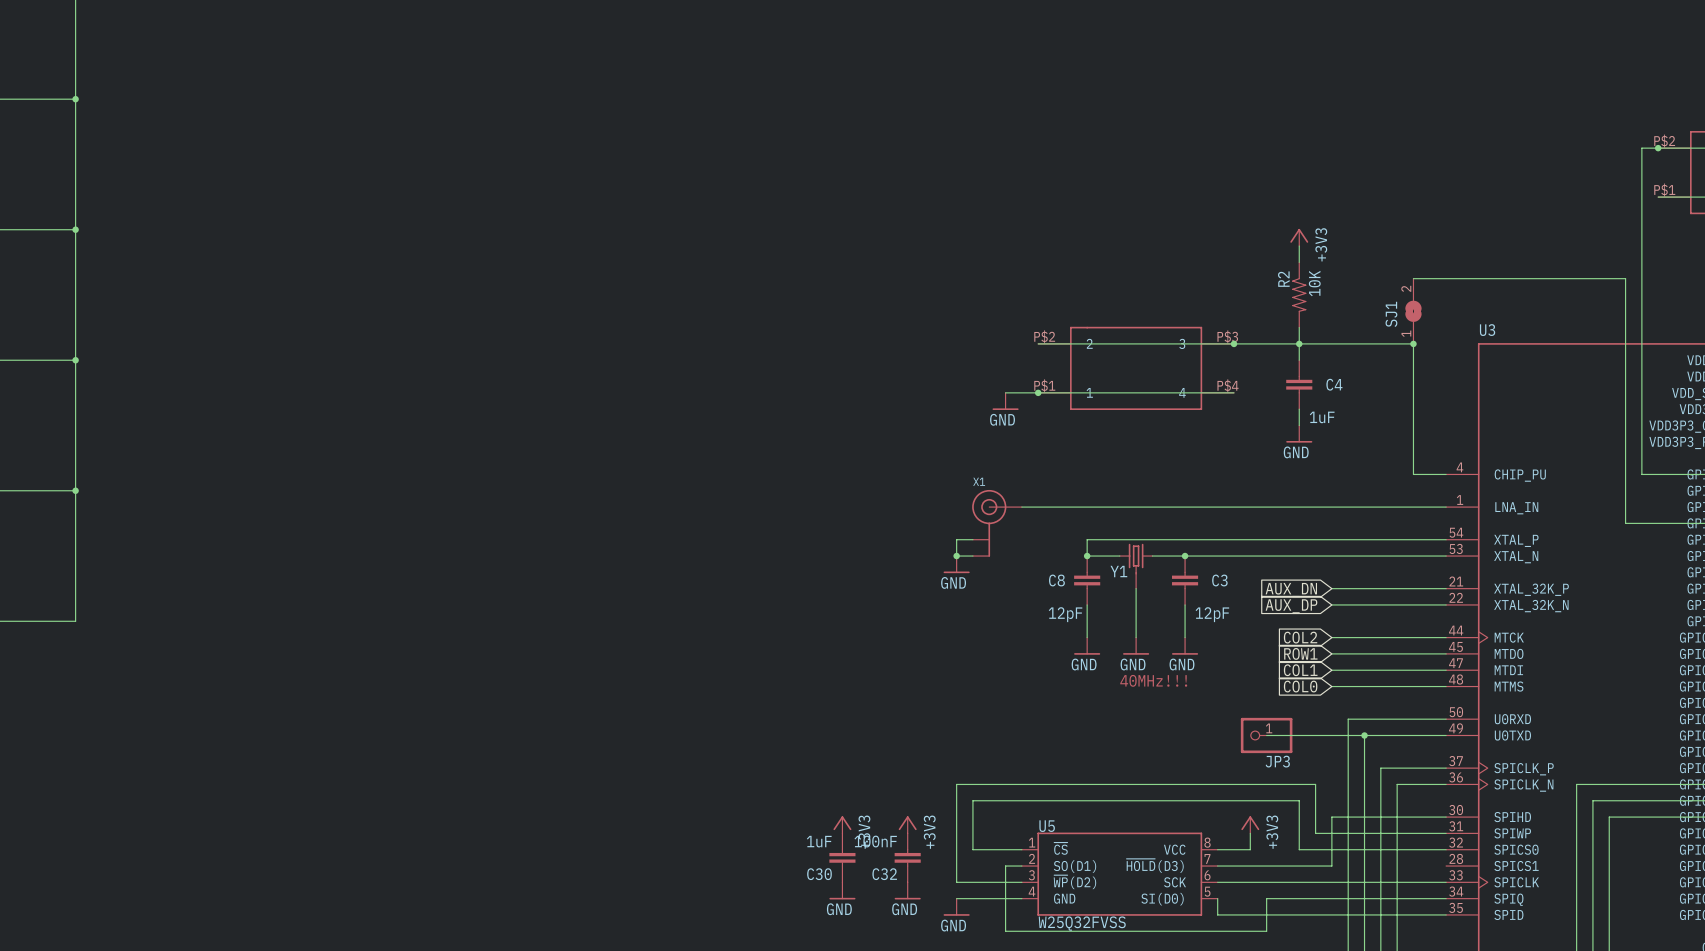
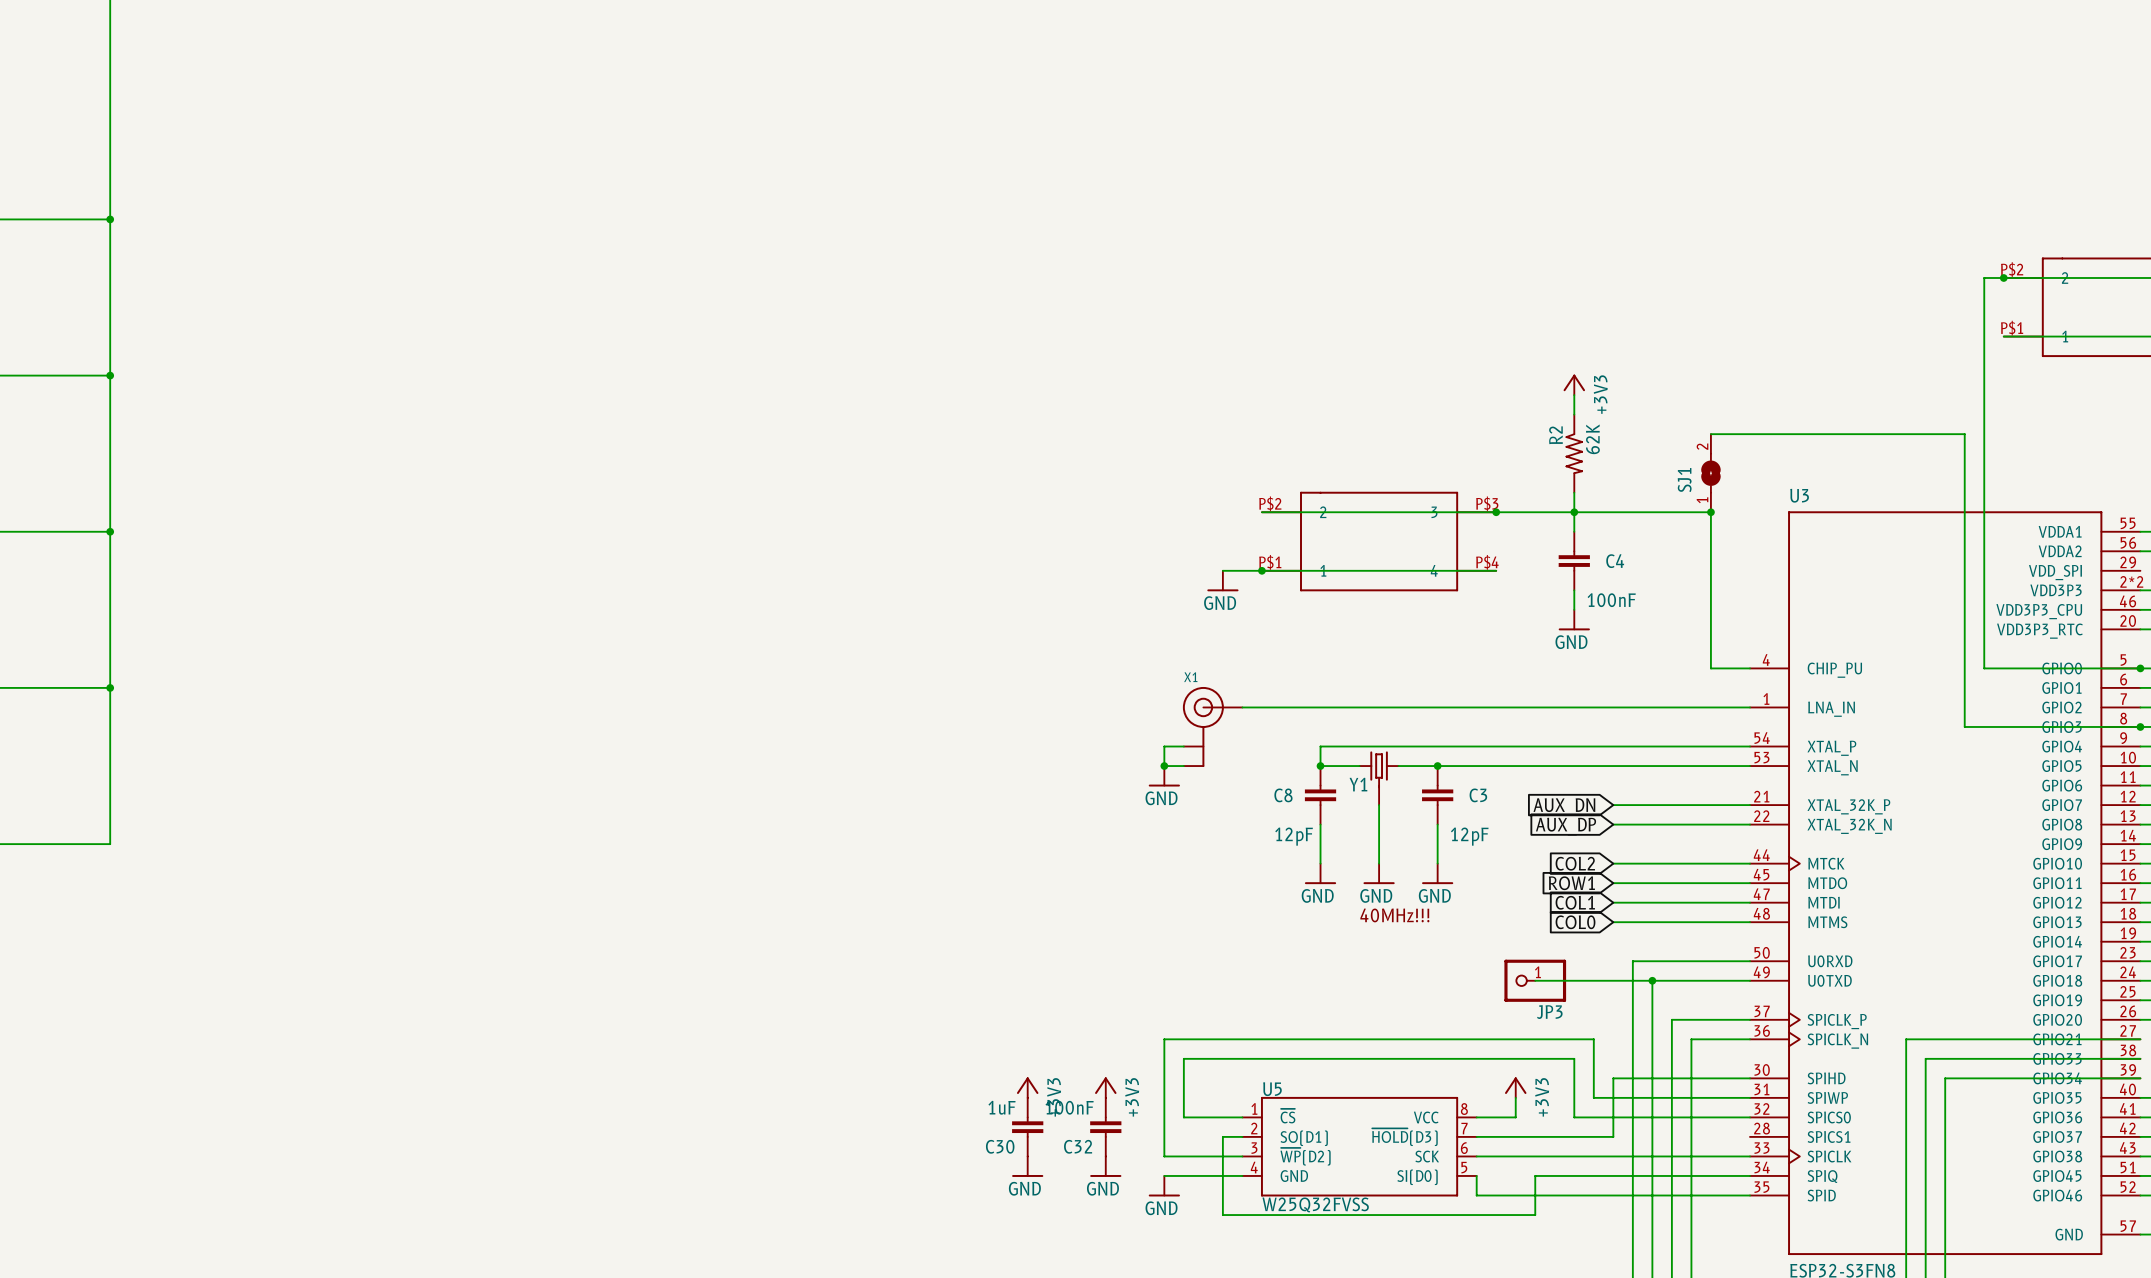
R2 value: 10K (1314, 283) -> 62K (1592, 439)
C4 value: 1uF (1322, 417) -> 100nF (1611, 600)

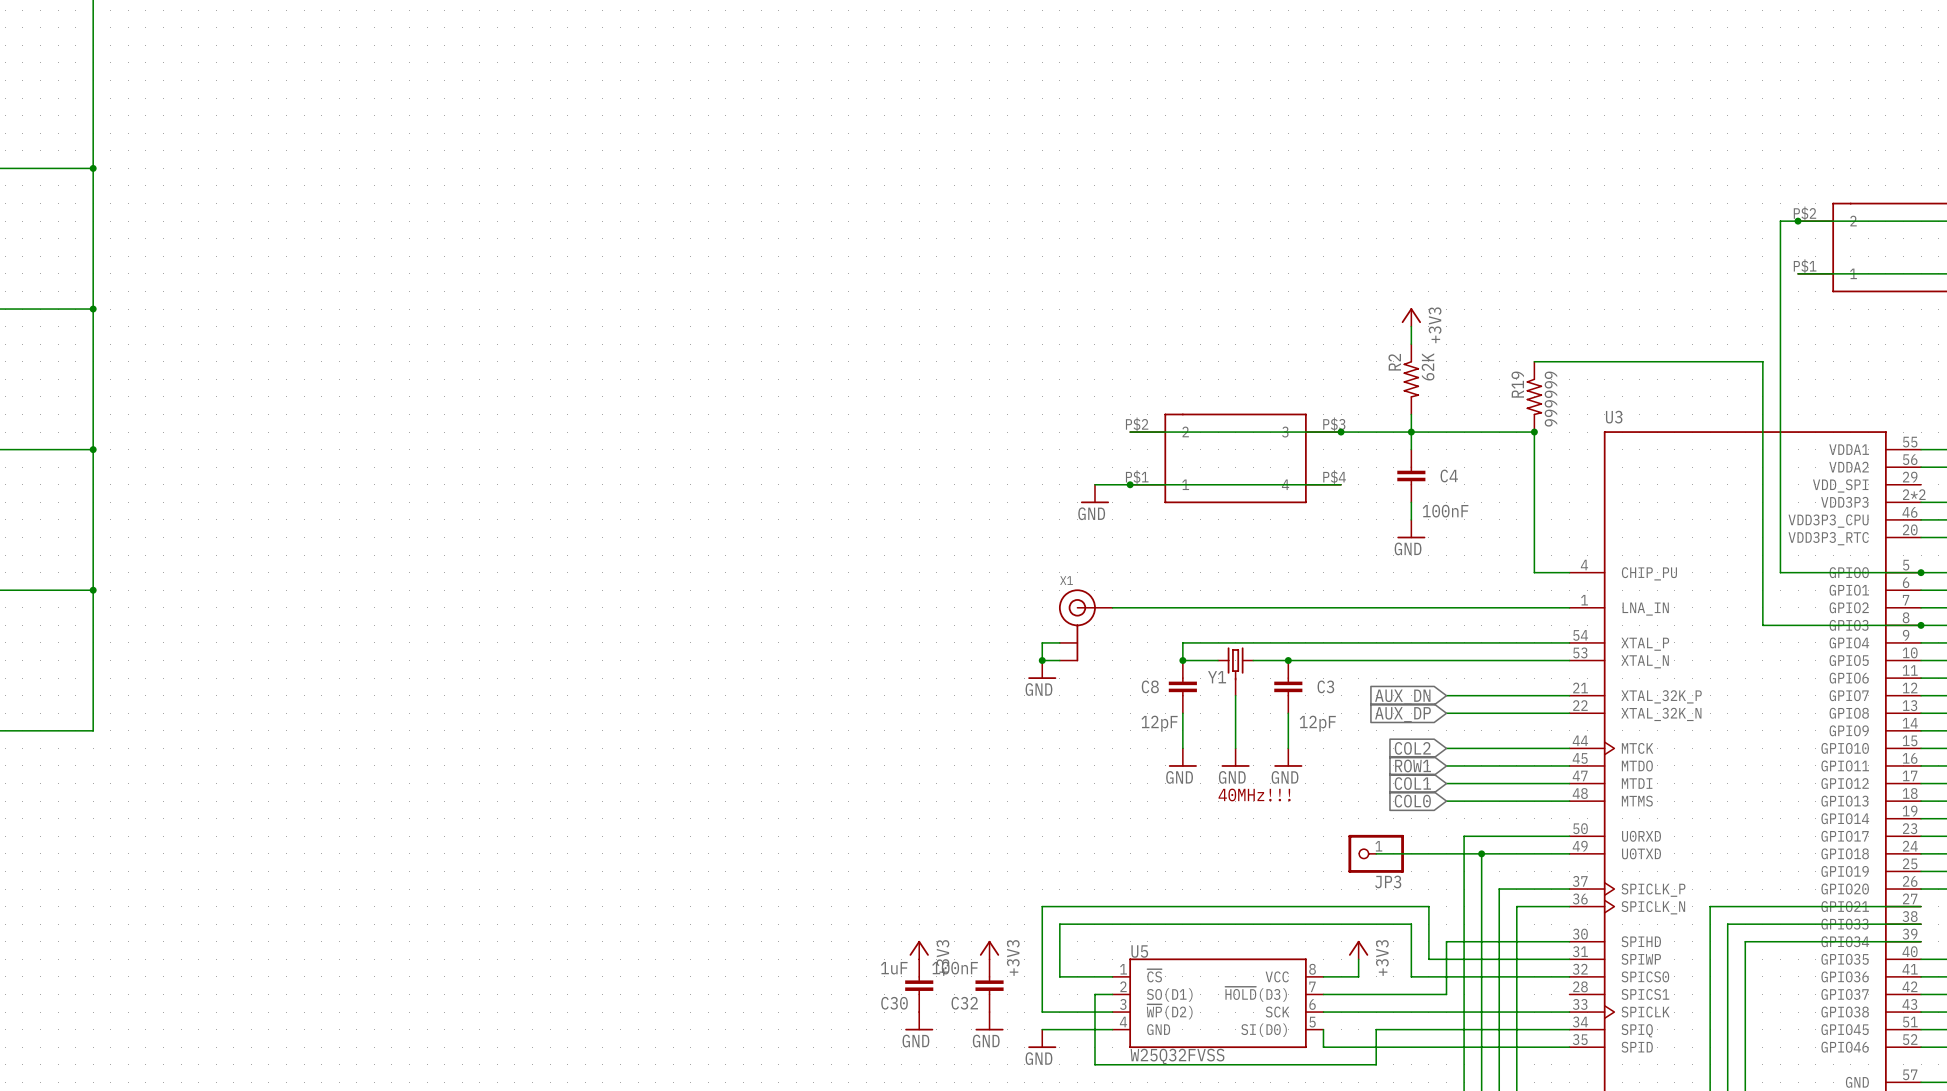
SJ1: (1710, 473) -> none
R19: none -> 999999 (1534, 396)

